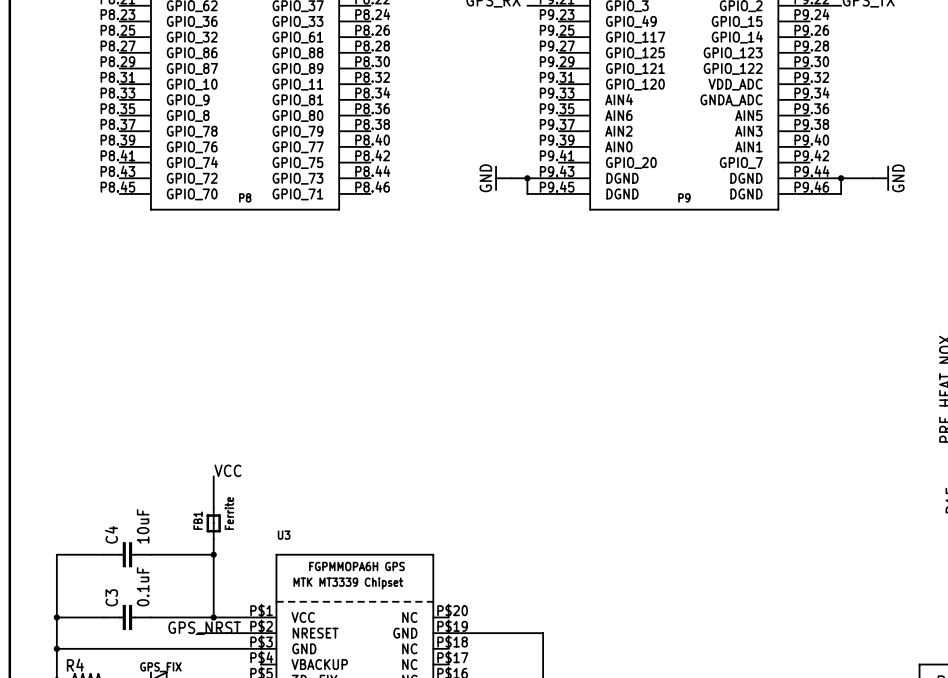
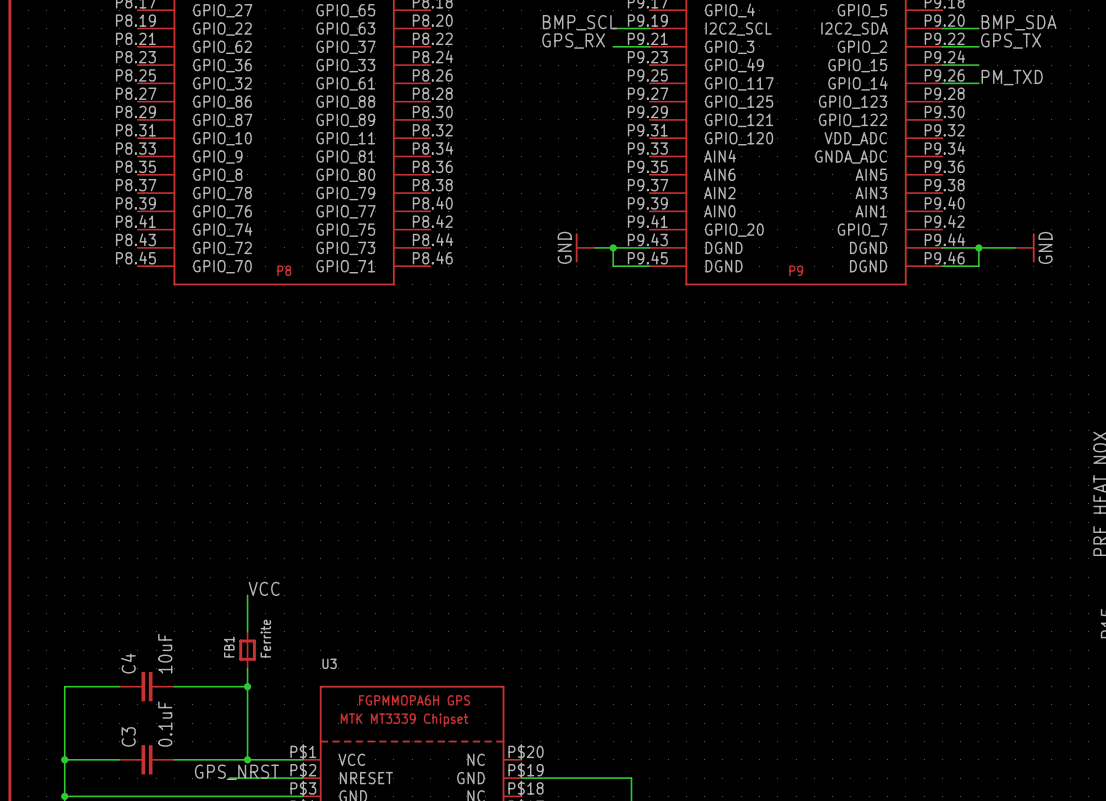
wire: none -> (942, 65) (978, 65)
label: none -> PM_TXD (1012, 77)
wire: none -> (942, 83) (978, 83)

